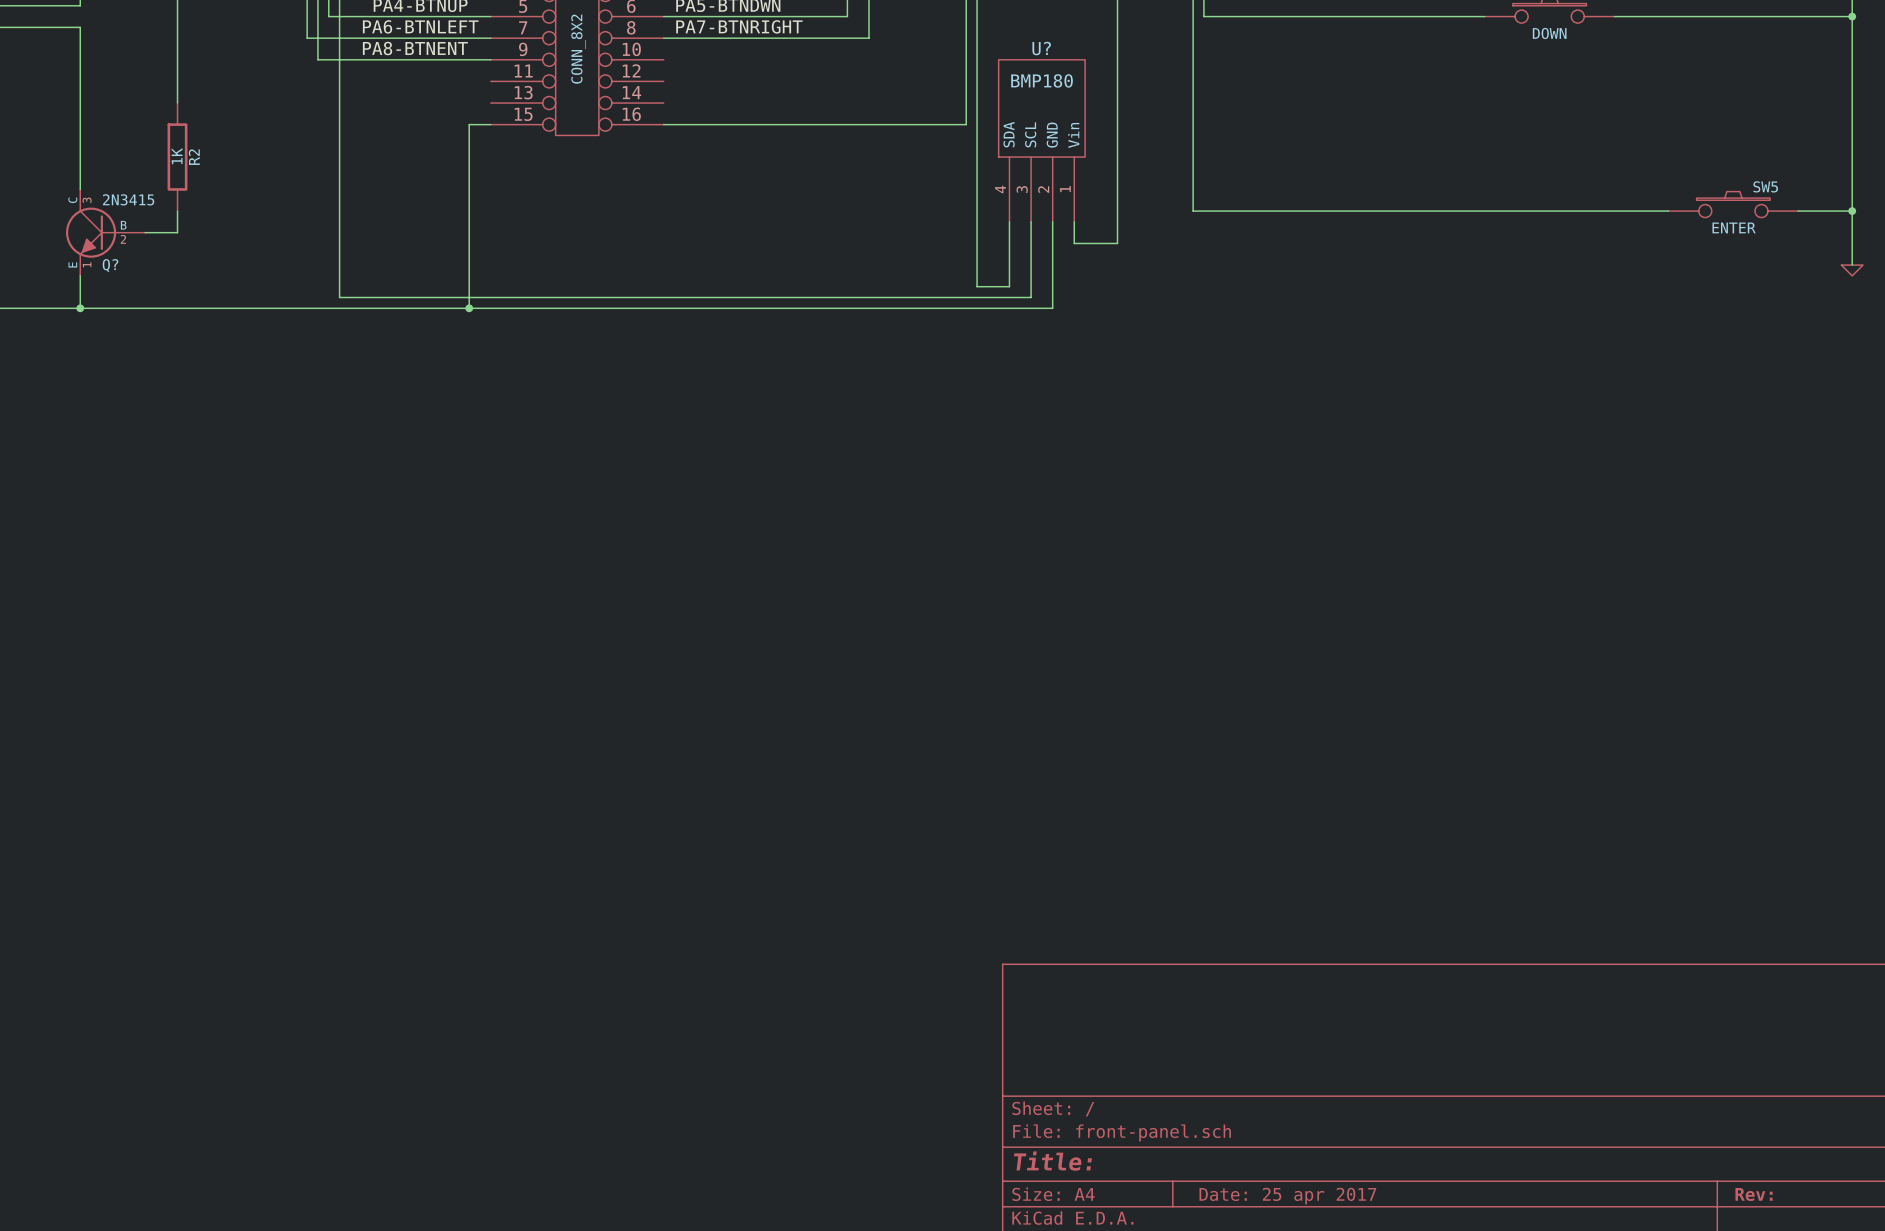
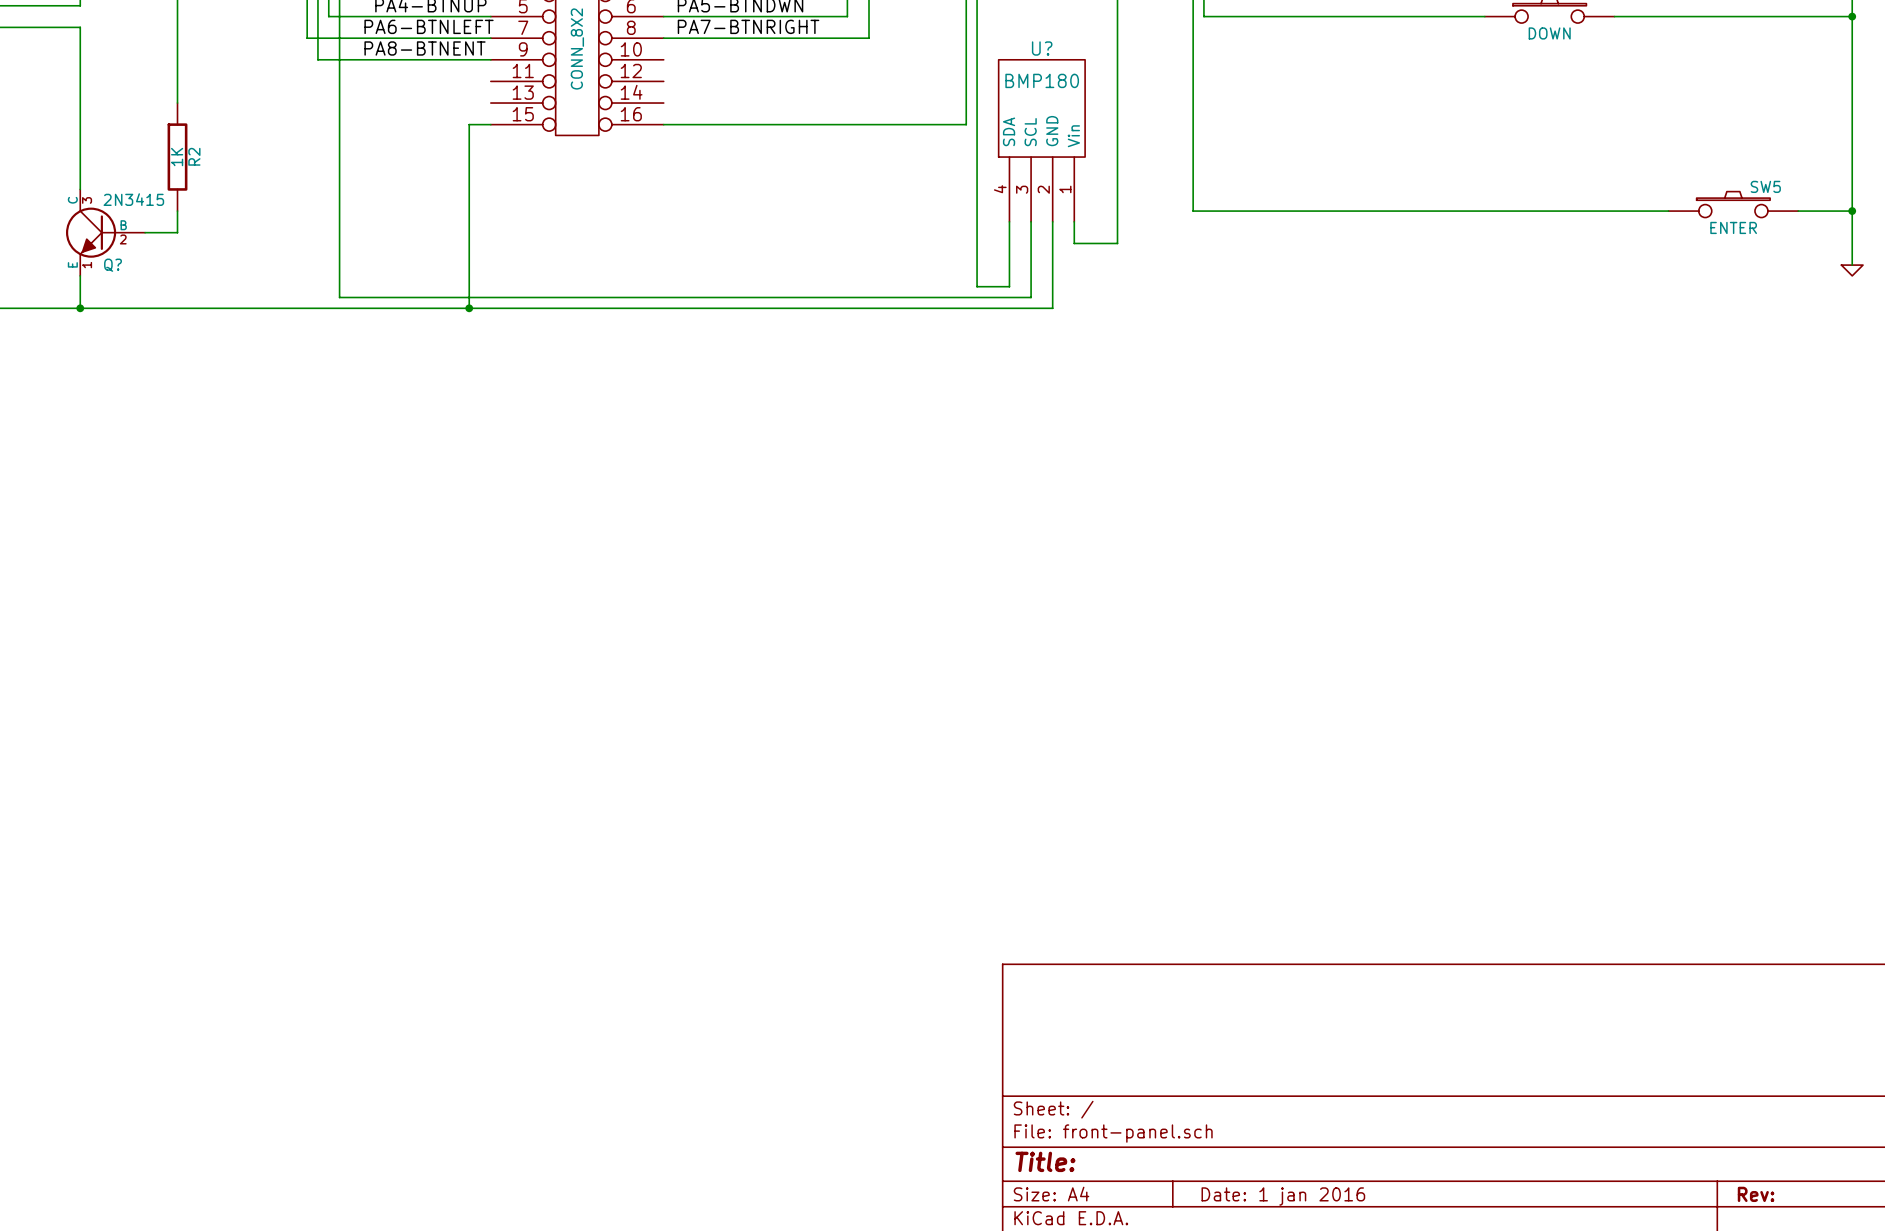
title block: Date: 25 apr 2017 (1287, 1196) -> Date: 1 jan 2016 (1283, 1196)

